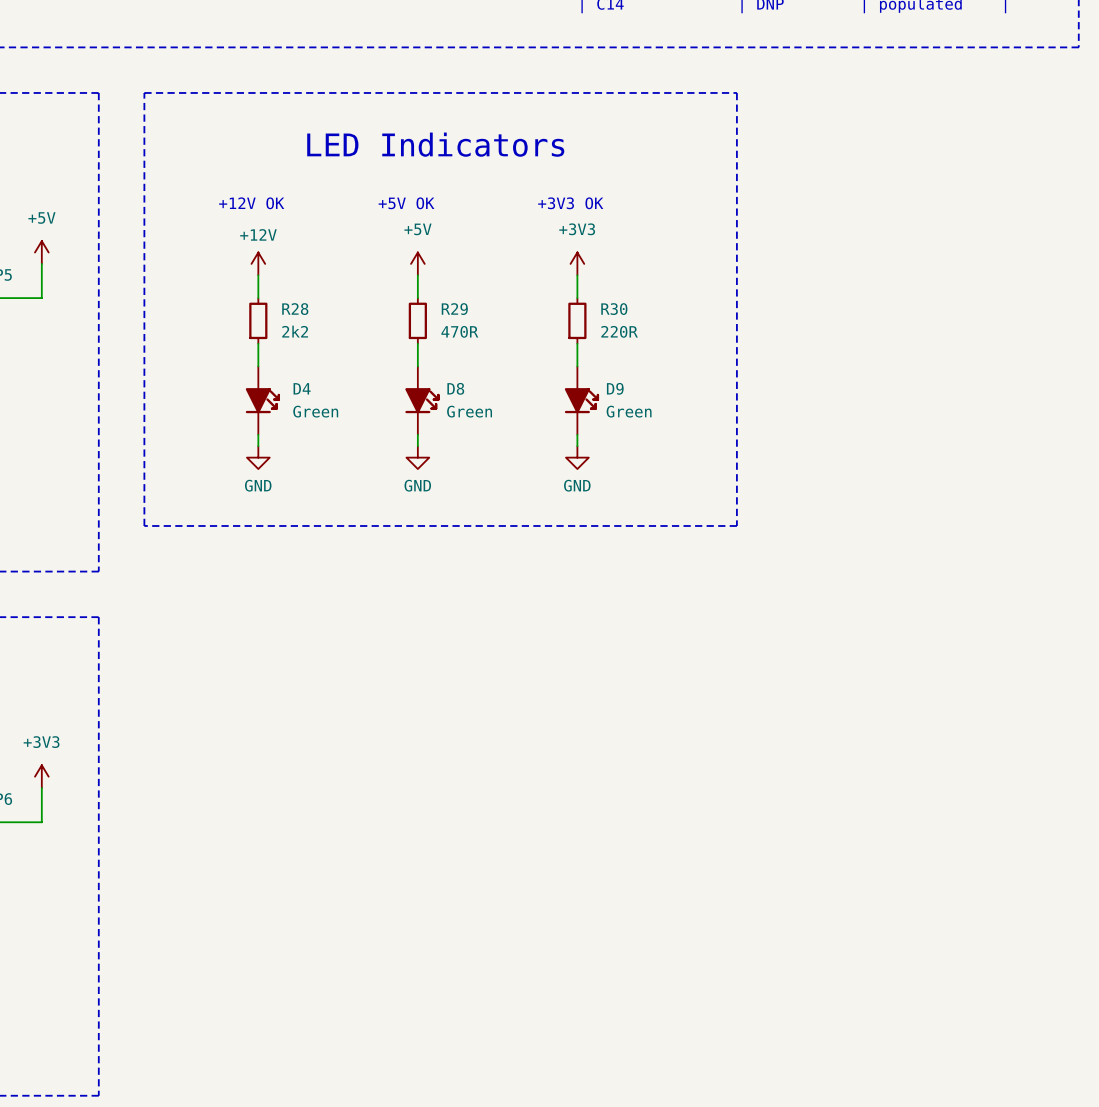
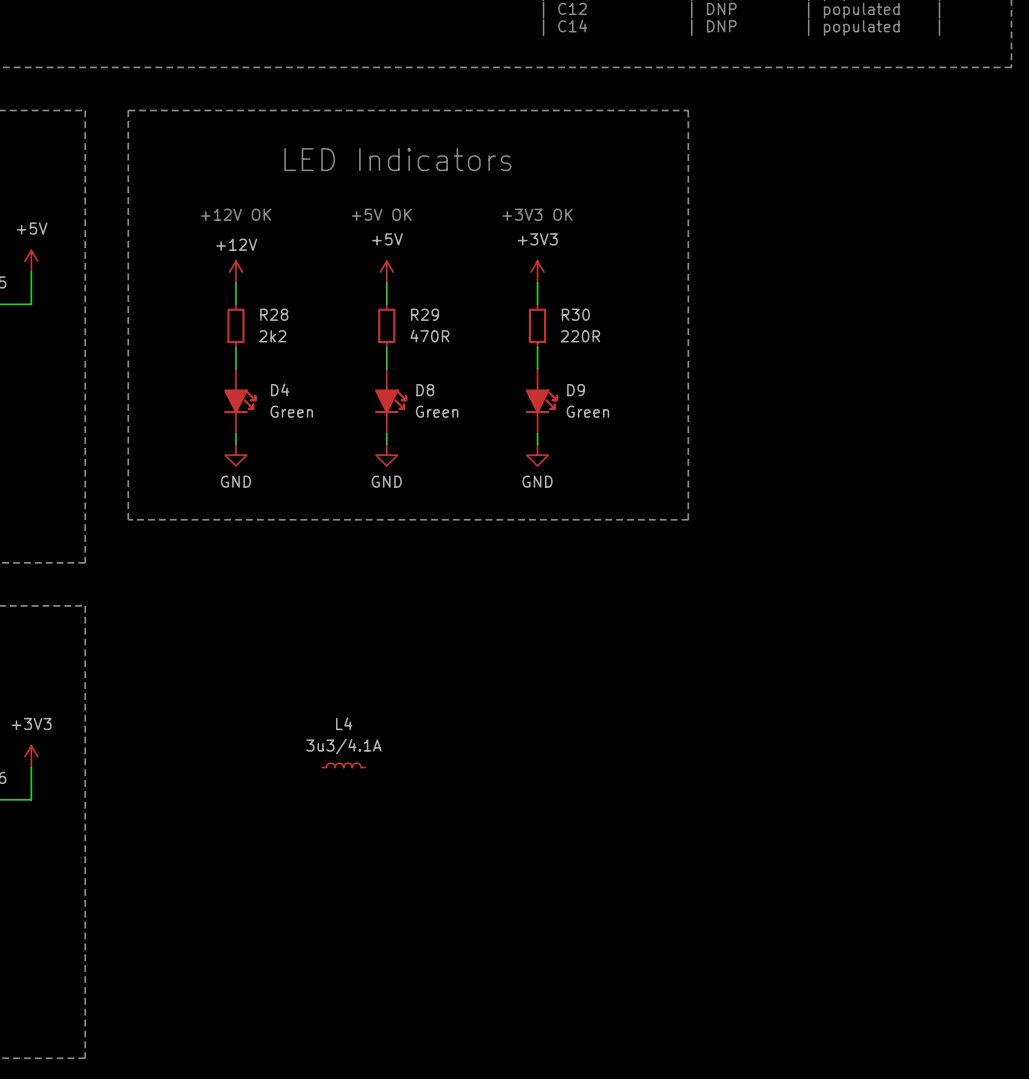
L4: none -> (343, 765)

